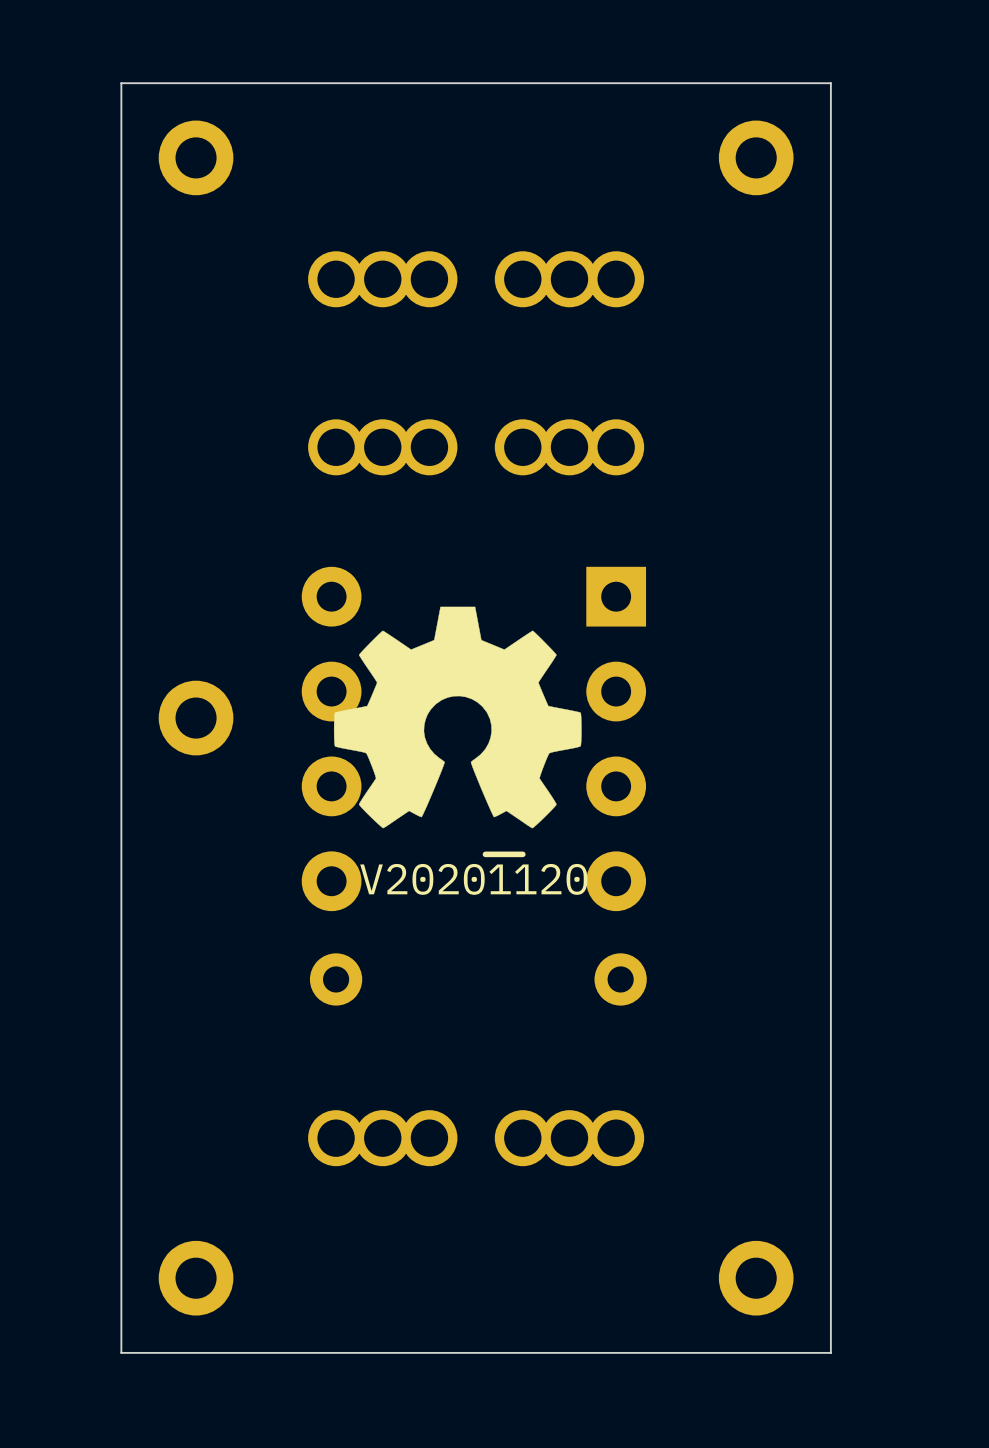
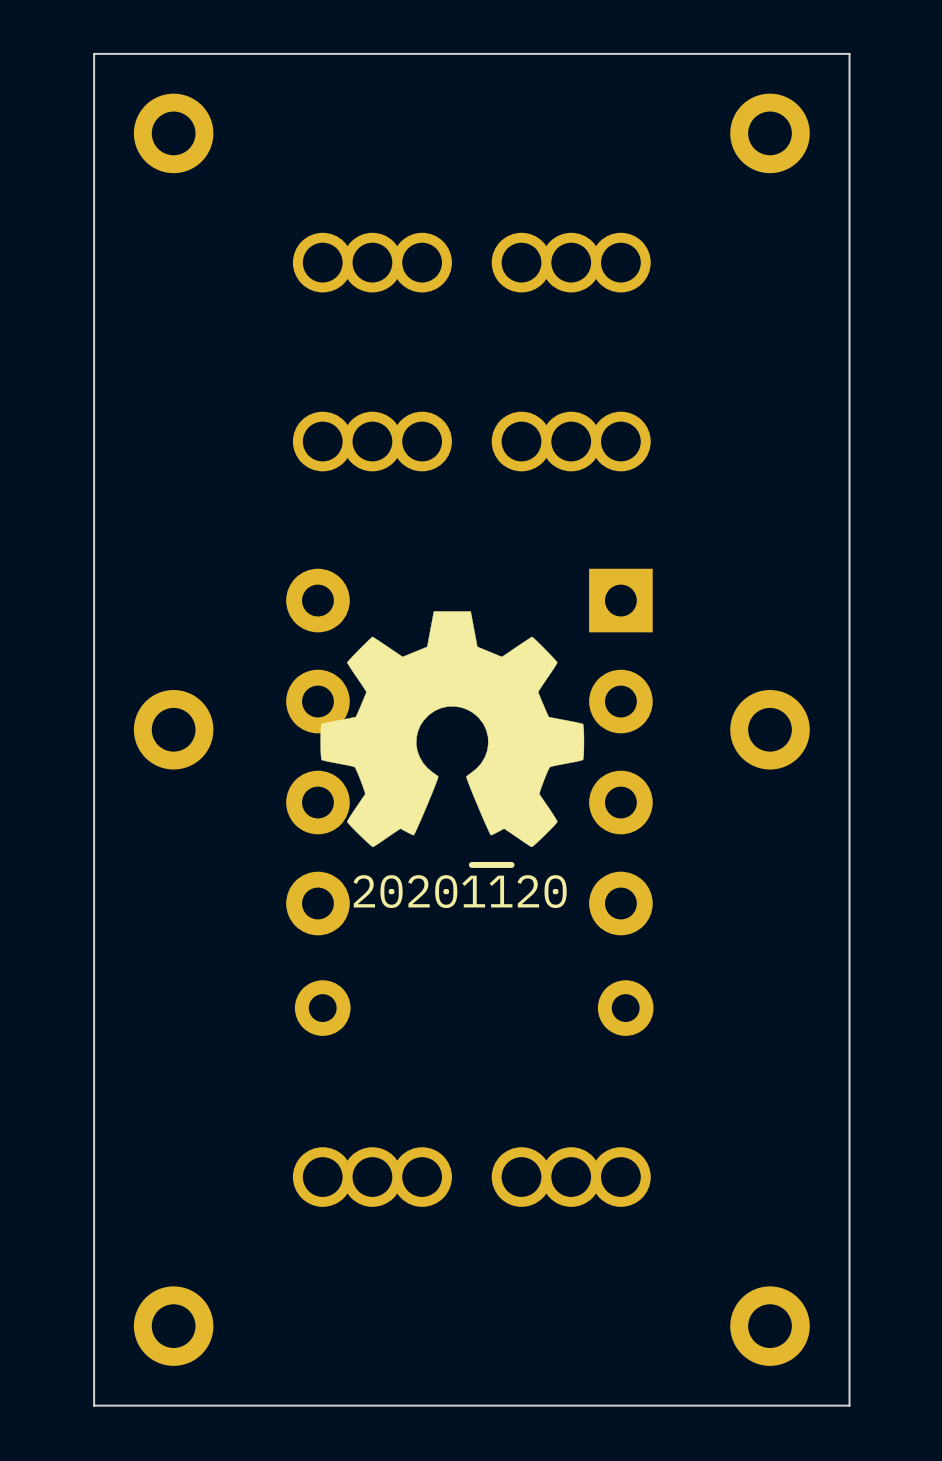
part: none -> (770, 729)
drawing shape: [360, 851, 588, 895] -> [353, 861, 567, 909]

